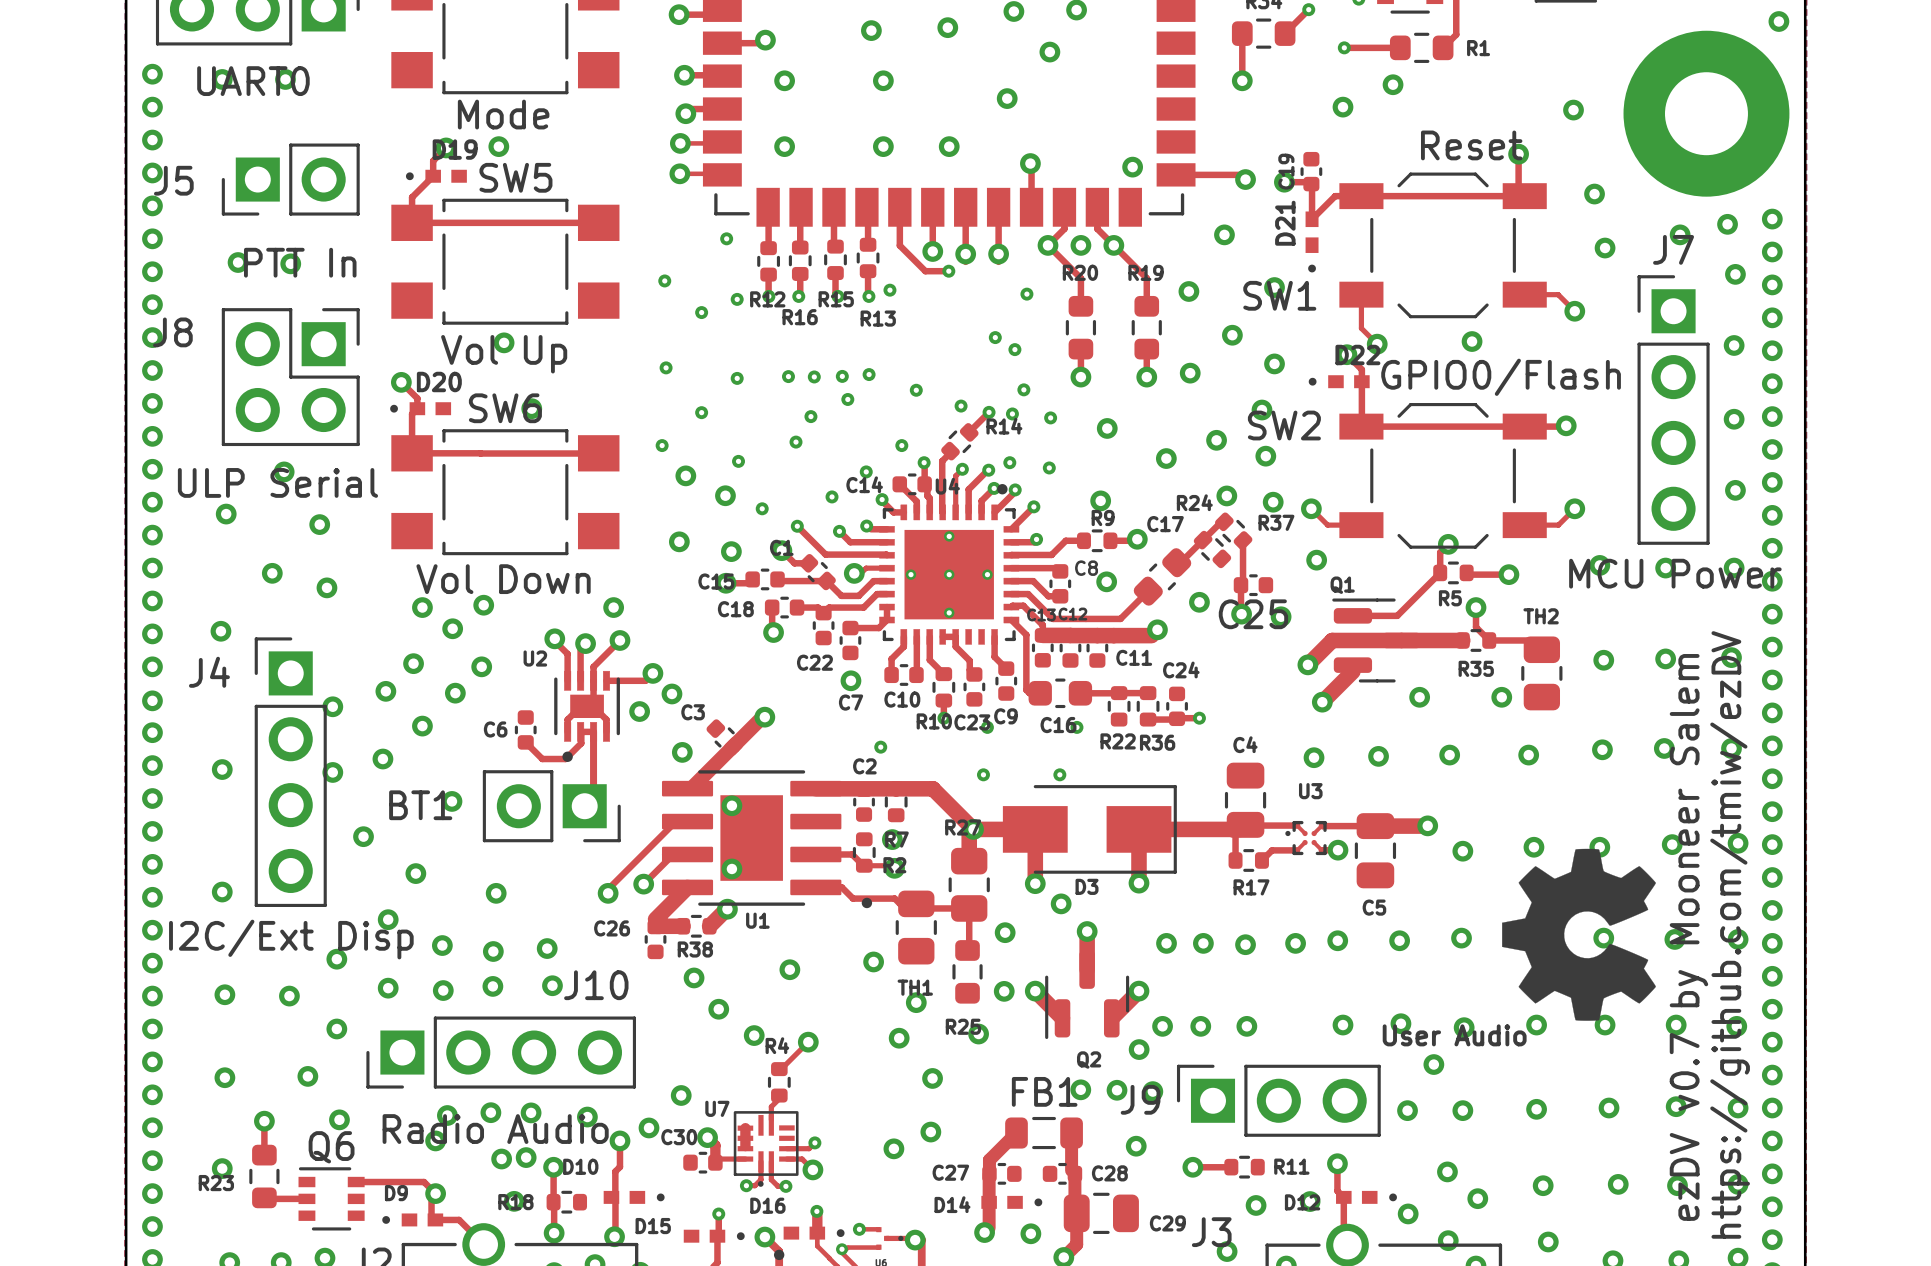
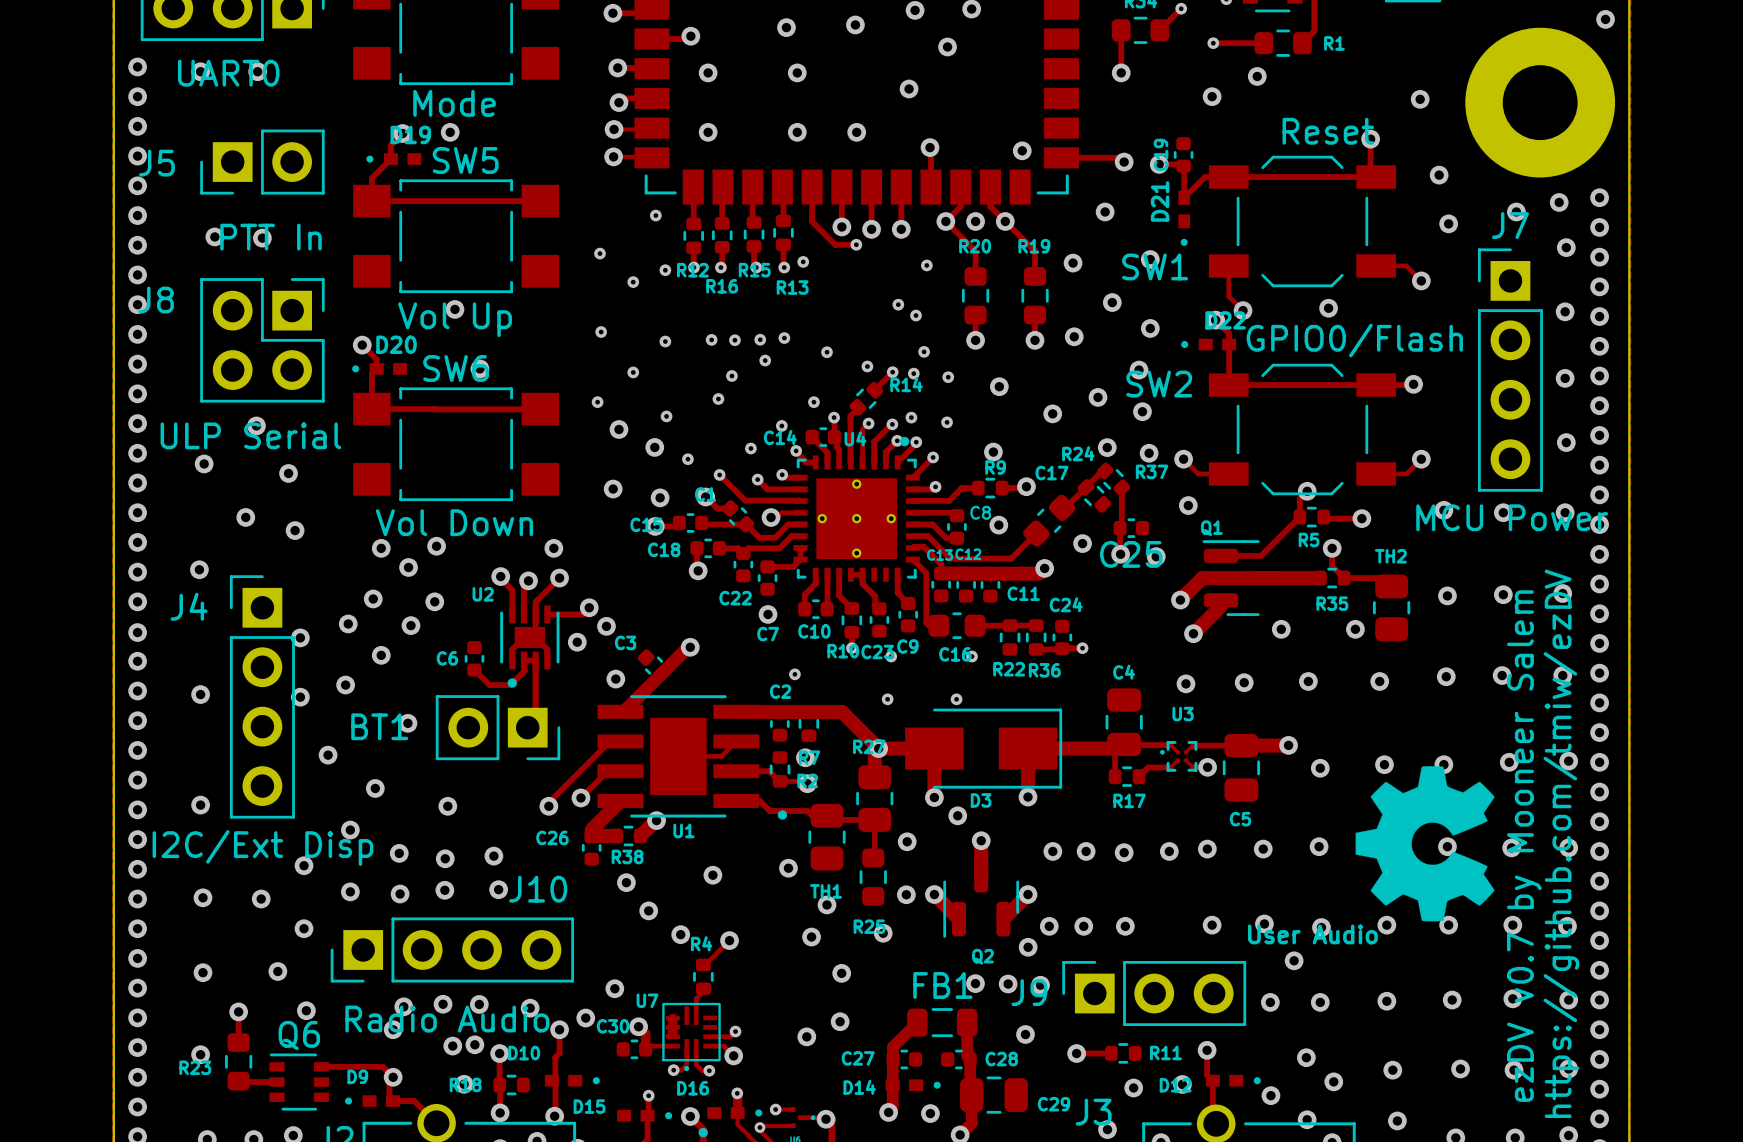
via: (731, 805) -> none
top track: none -> (736, 741) (721, 756) (678, 756)
via: (731, 868) -> none

